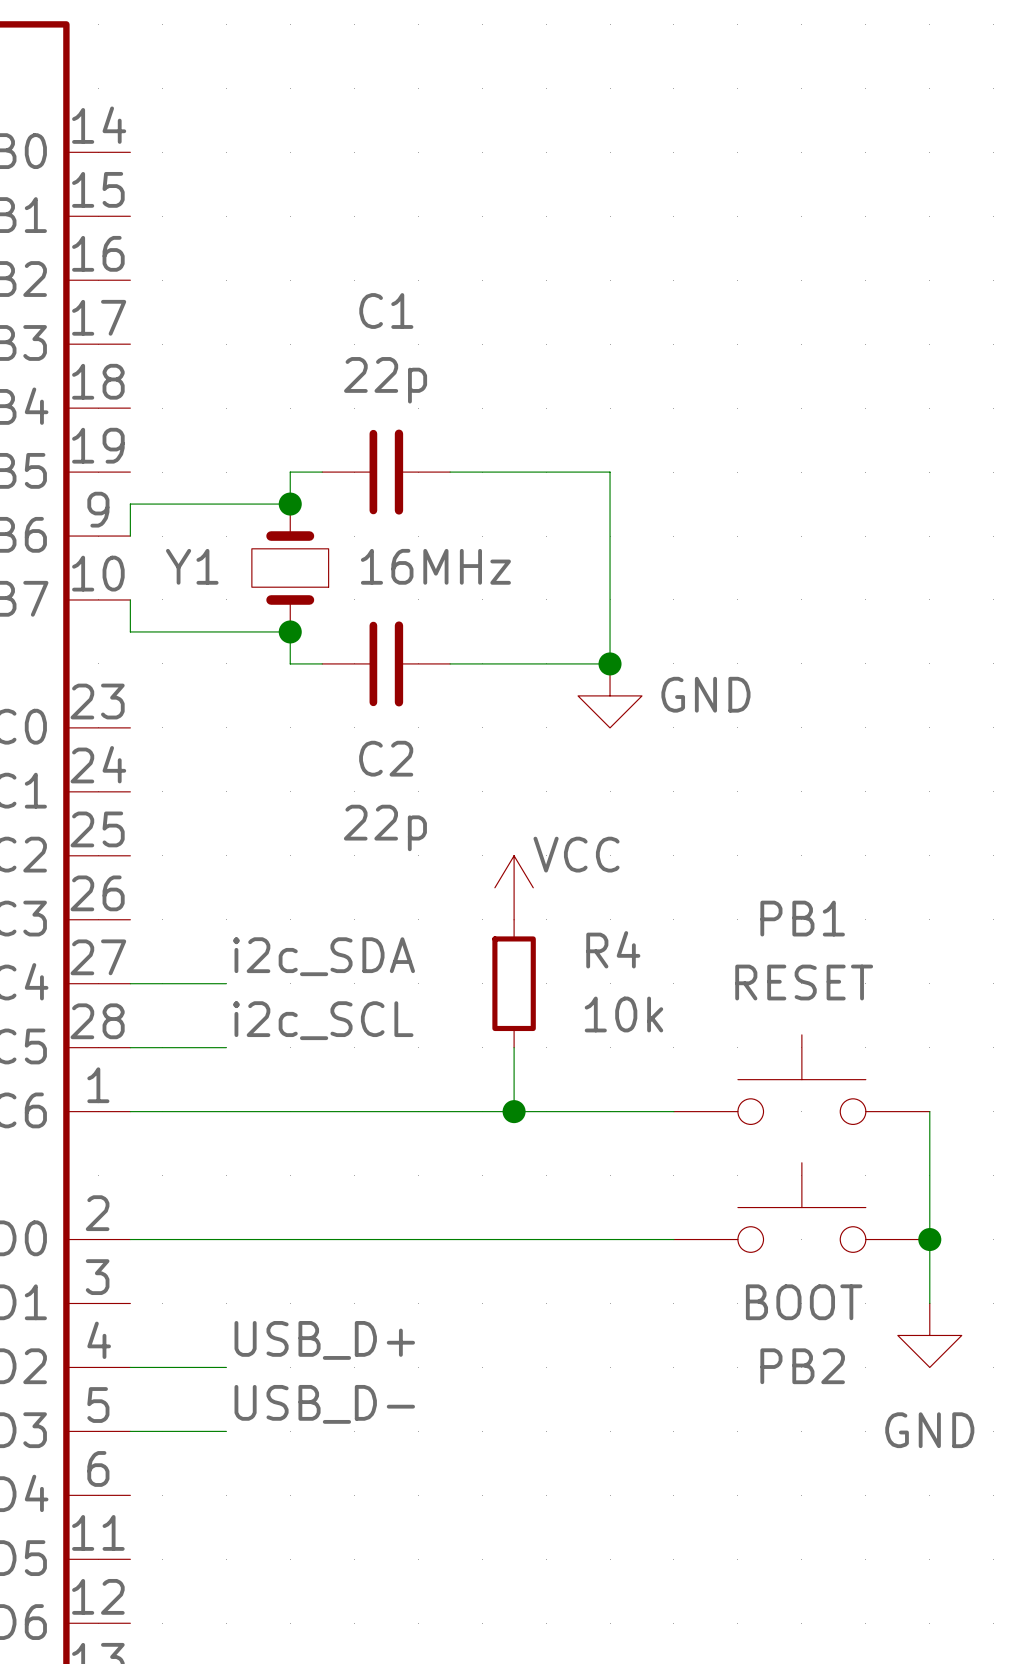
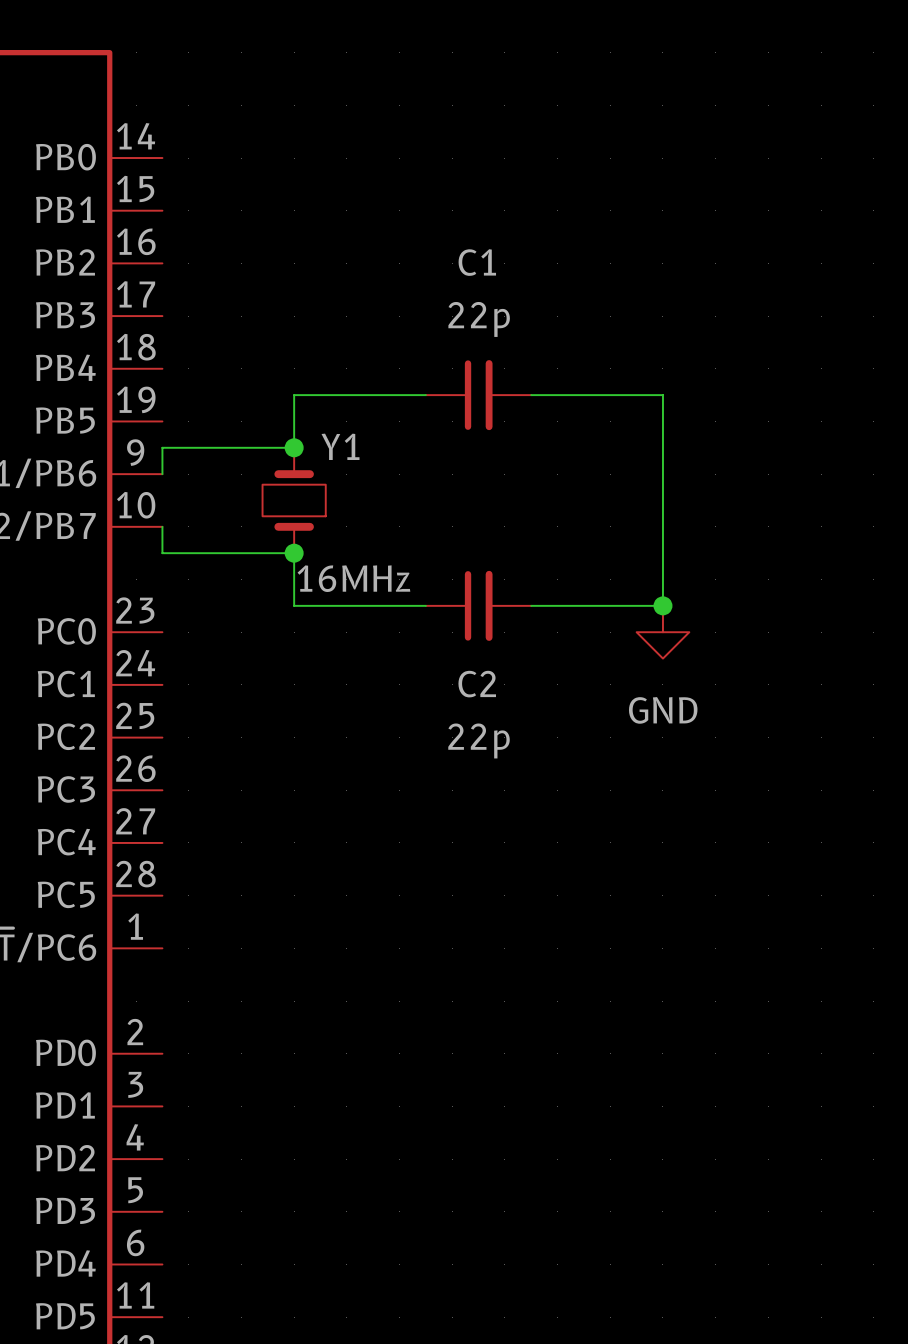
wire: none -> (531, 395) (662, 395) (662, 605) (531, 605)
wire: (290, 472) (322, 472) -> (294, 421) (294, 395) (425, 395)
C1 position: (386, 472) -> (478, 395)
wire: (450, 472) (610, 472) (610, 663) (450, 663) -> none
Y1 name position: Y1 (192, 566) -> Y1 (340, 446)
Y1 value position: 16MHz (435, 566) -> 16MHz (353, 578)
wire: (290, 663) (322, 663) -> (294, 579) (294, 605) (425, 605)
C2 position: (386, 663) -> (478, 605)
junction position: (610, 663) -> (662, 605)
power symbol text position: GND (705, 694) -> GND (663, 710)
power symbol position: GND (610, 695) -> GND (662, 632)
power symbol: VCC (514, 887) -> none
label: i2c_SDA (323, 956) -> none
wire: (130, 983) (226, 983) -> none
R4: 10k (514, 983) -> none
label: i2c_SCL (323, 1020) -> none
wire: (130, 1047) (226, 1047) -> none
wire: (514, 1047) (514, 1111) -> none
PB1: RESET (801, 1079) -> none
wire: (130, 1111) (673, 1111) -> none
junction: (514, 1111) -> none
wire: (929, 1111) (929, 1303) -> none
PB2: BOOT (801, 1207) -> none
wire: (130, 1239) (673, 1239) -> none
junction: (929, 1239) -> none
power symbol: GND (929, 1335) -> none
label: USB_D+ (324, 1340) -> none
wire: (130, 1367) (226, 1367) -> none
label: USB_D- (324, 1404) -> none
wire: (130, 1431) (226, 1431) -> none

